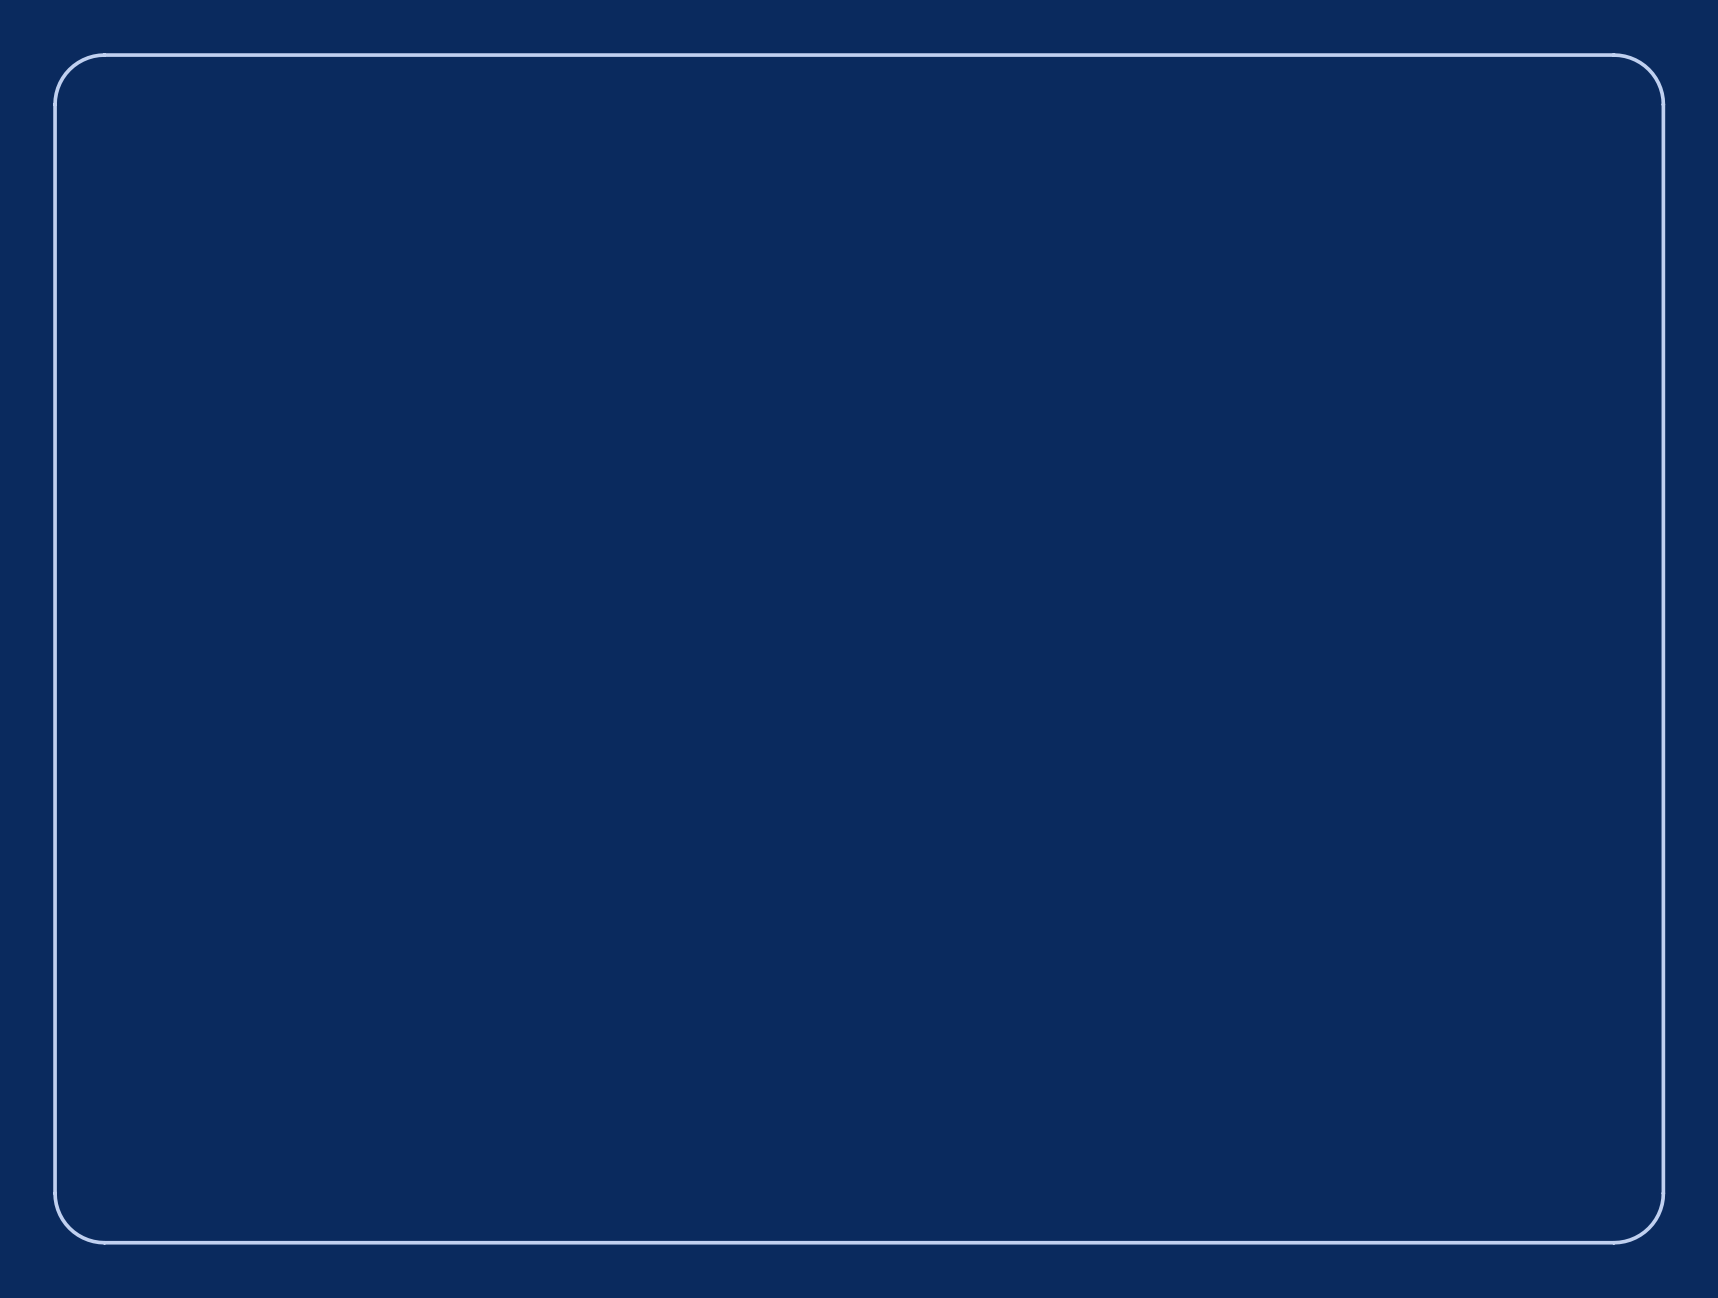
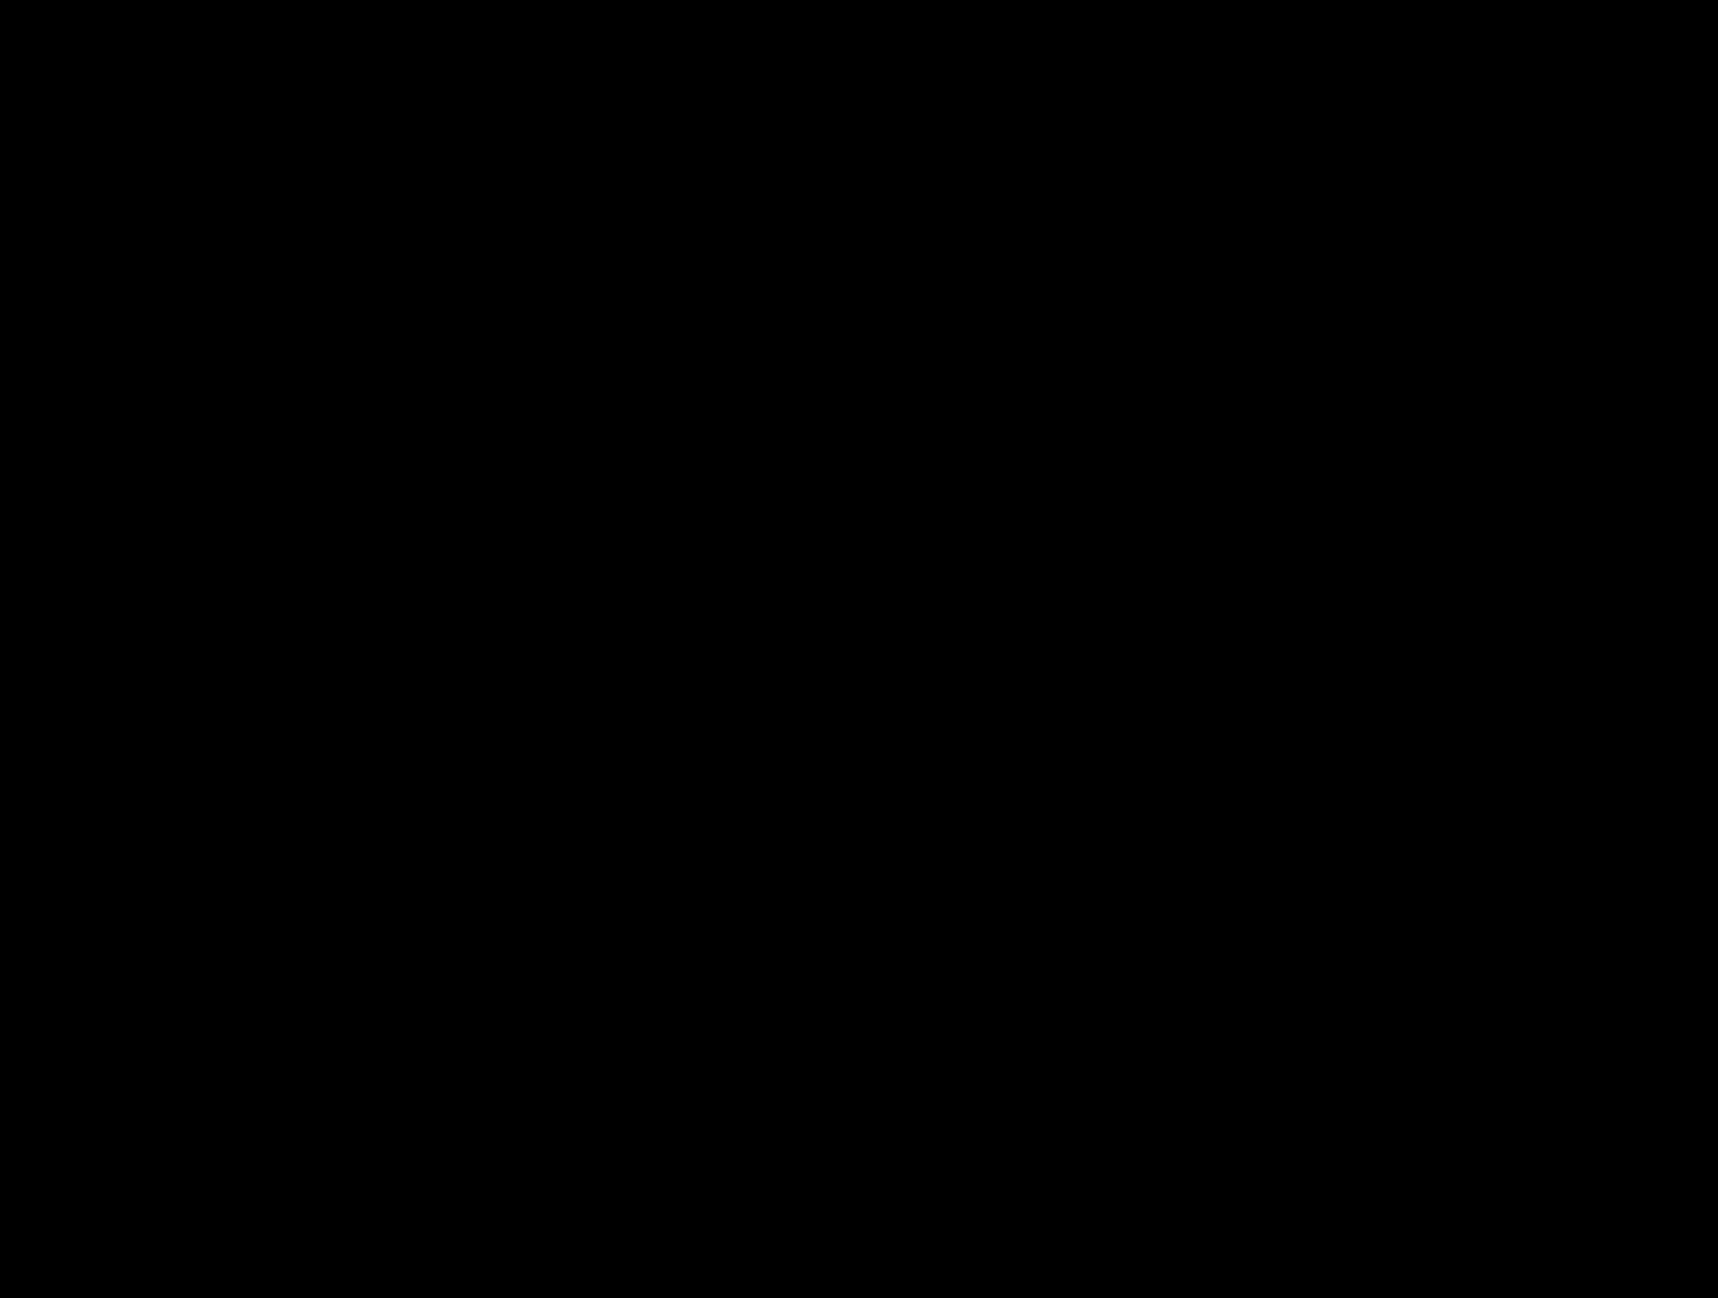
board edge: (1613, 55) (104, 55) (88, 57) (73, 65) (59, 83) (55, 104) (55, 1193) (57, 1209) (65, 1224) (83, 1237) (104, 1242) (1613, 1242) (1630, 1239) (1644, 1231) (1658, 1214) (1663, 1193) (1663, 104) (1658, 83) (1648, 69) (1635, 59) (1613, 55) -> none

